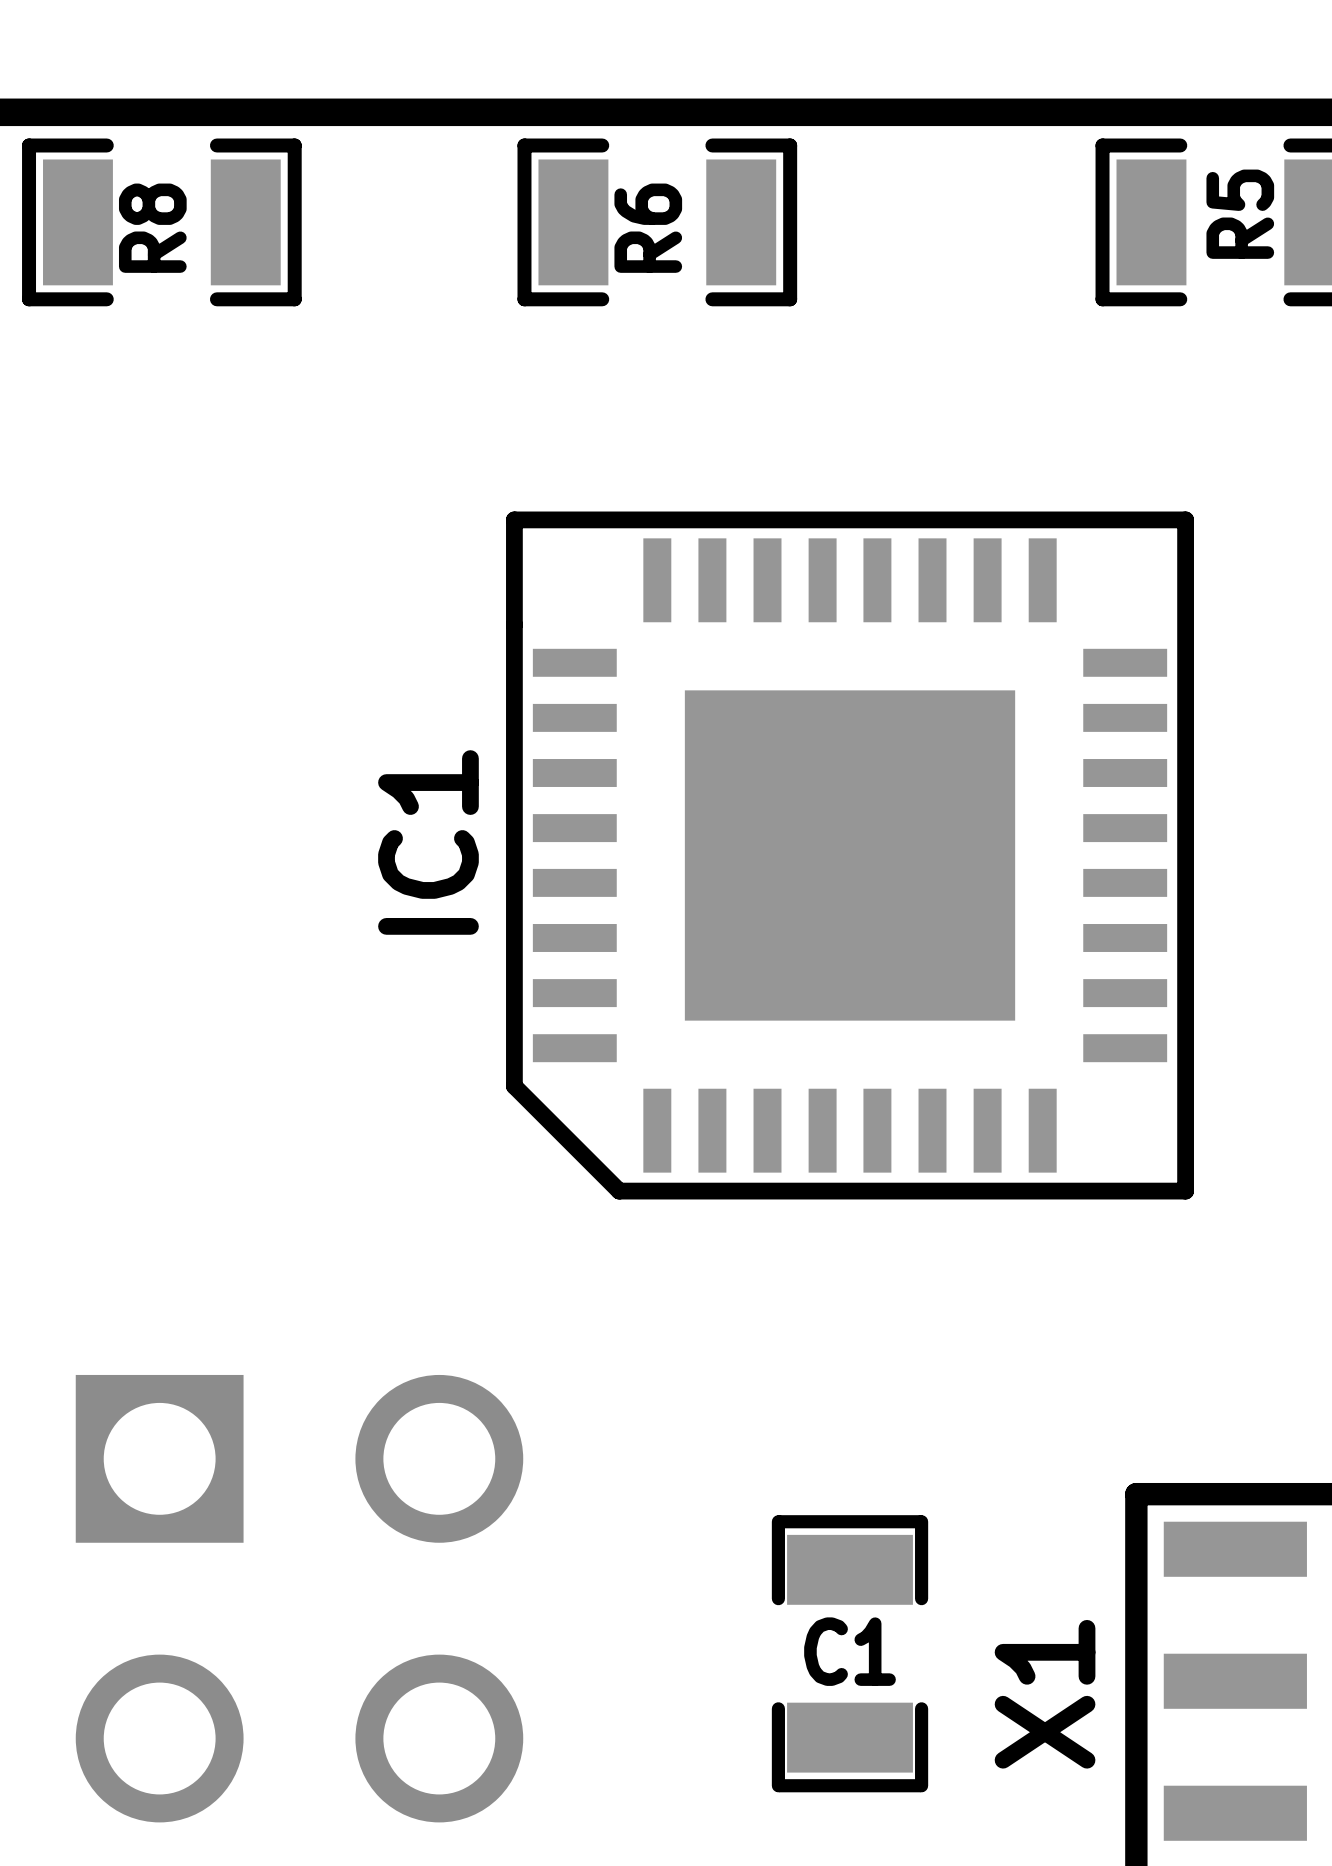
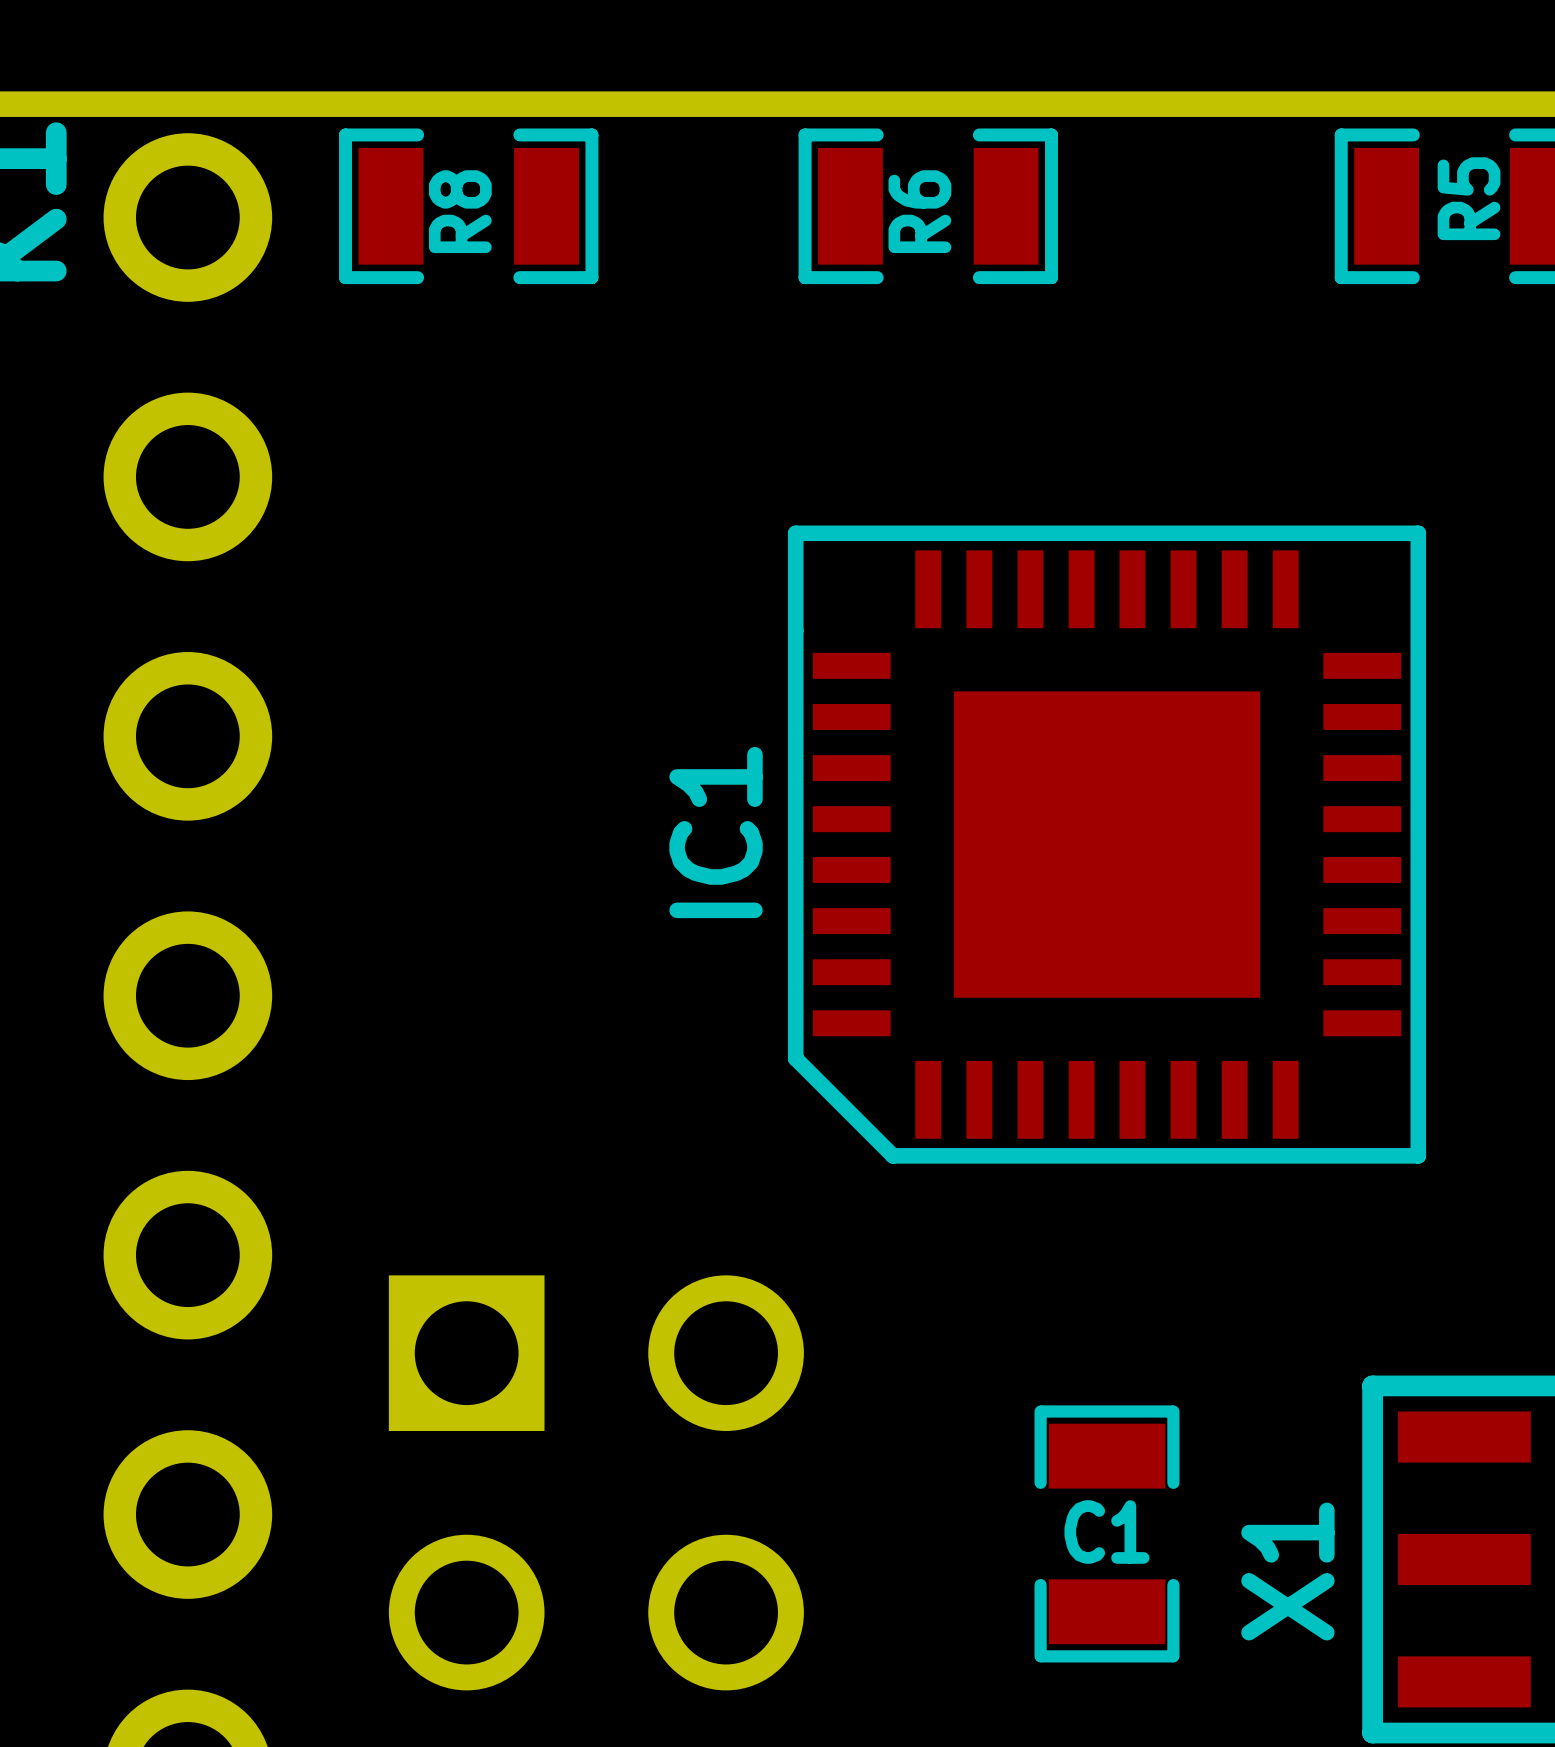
IC1 position: (850, 855) -> (1107, 844)

